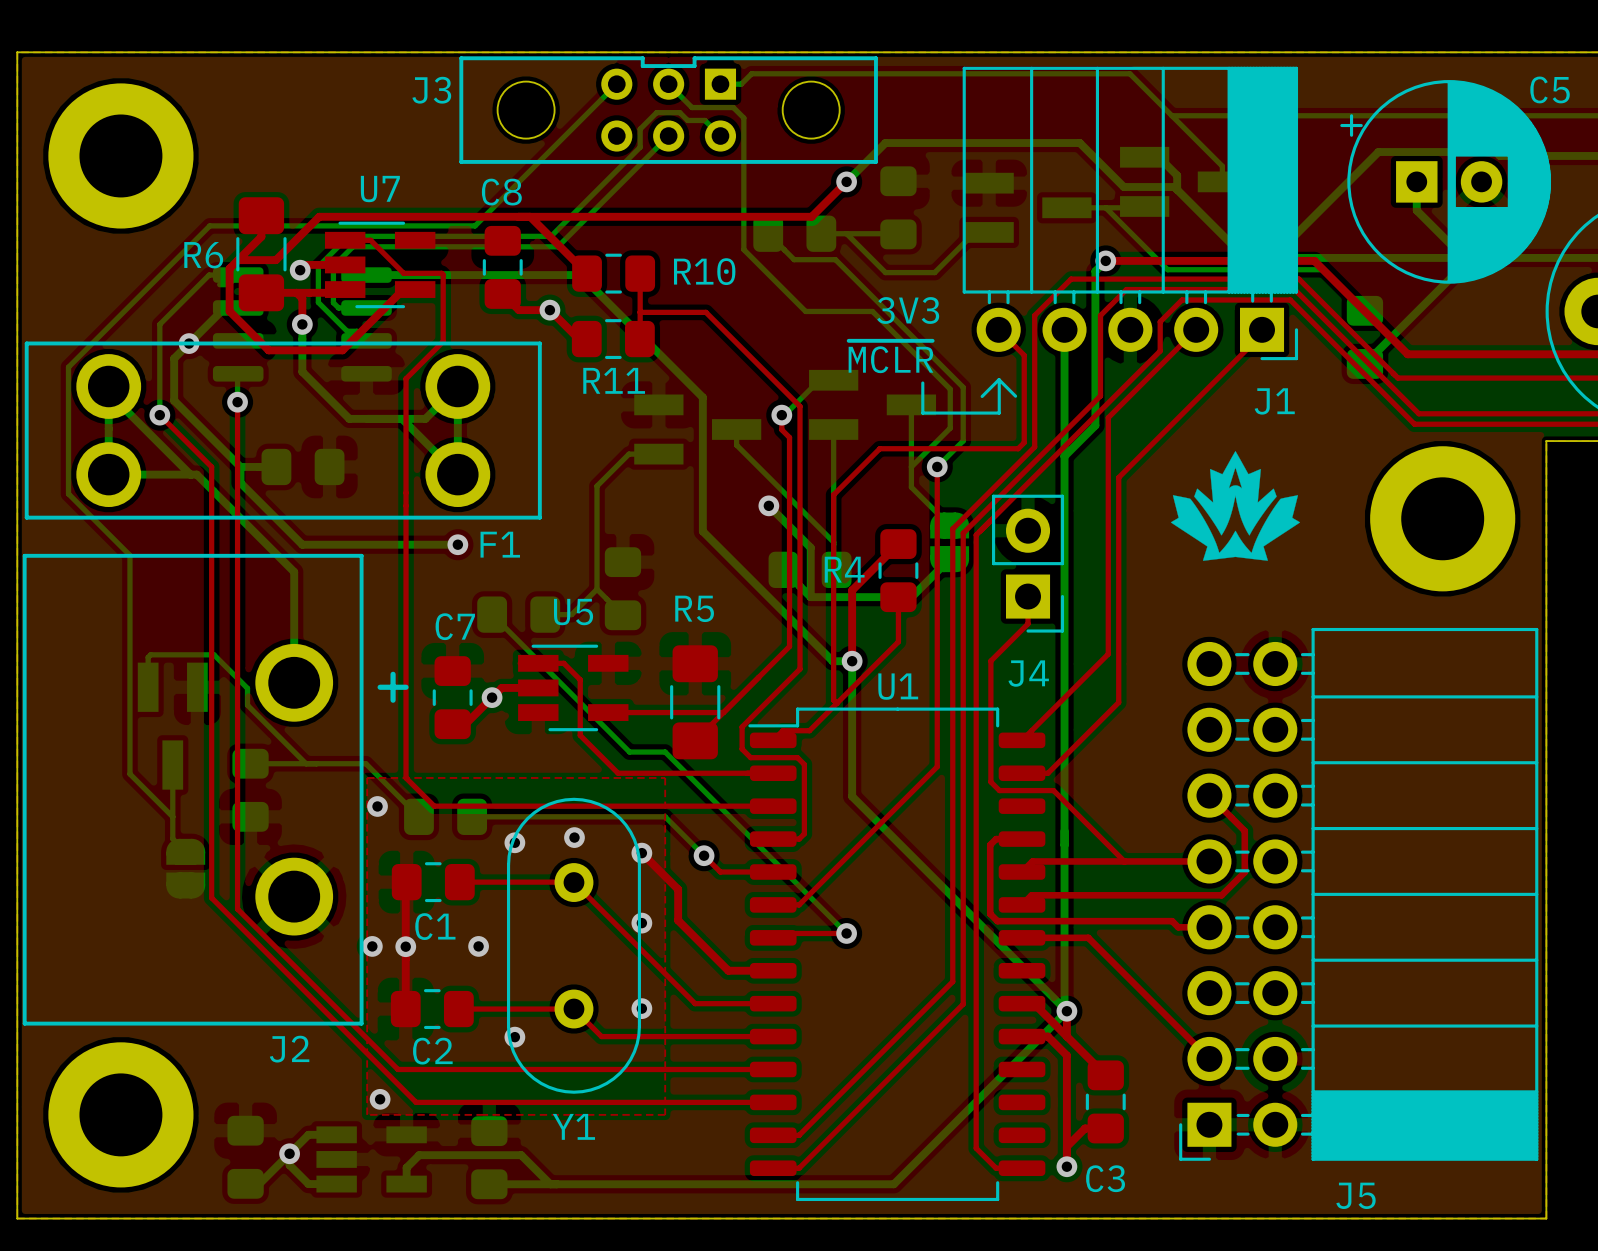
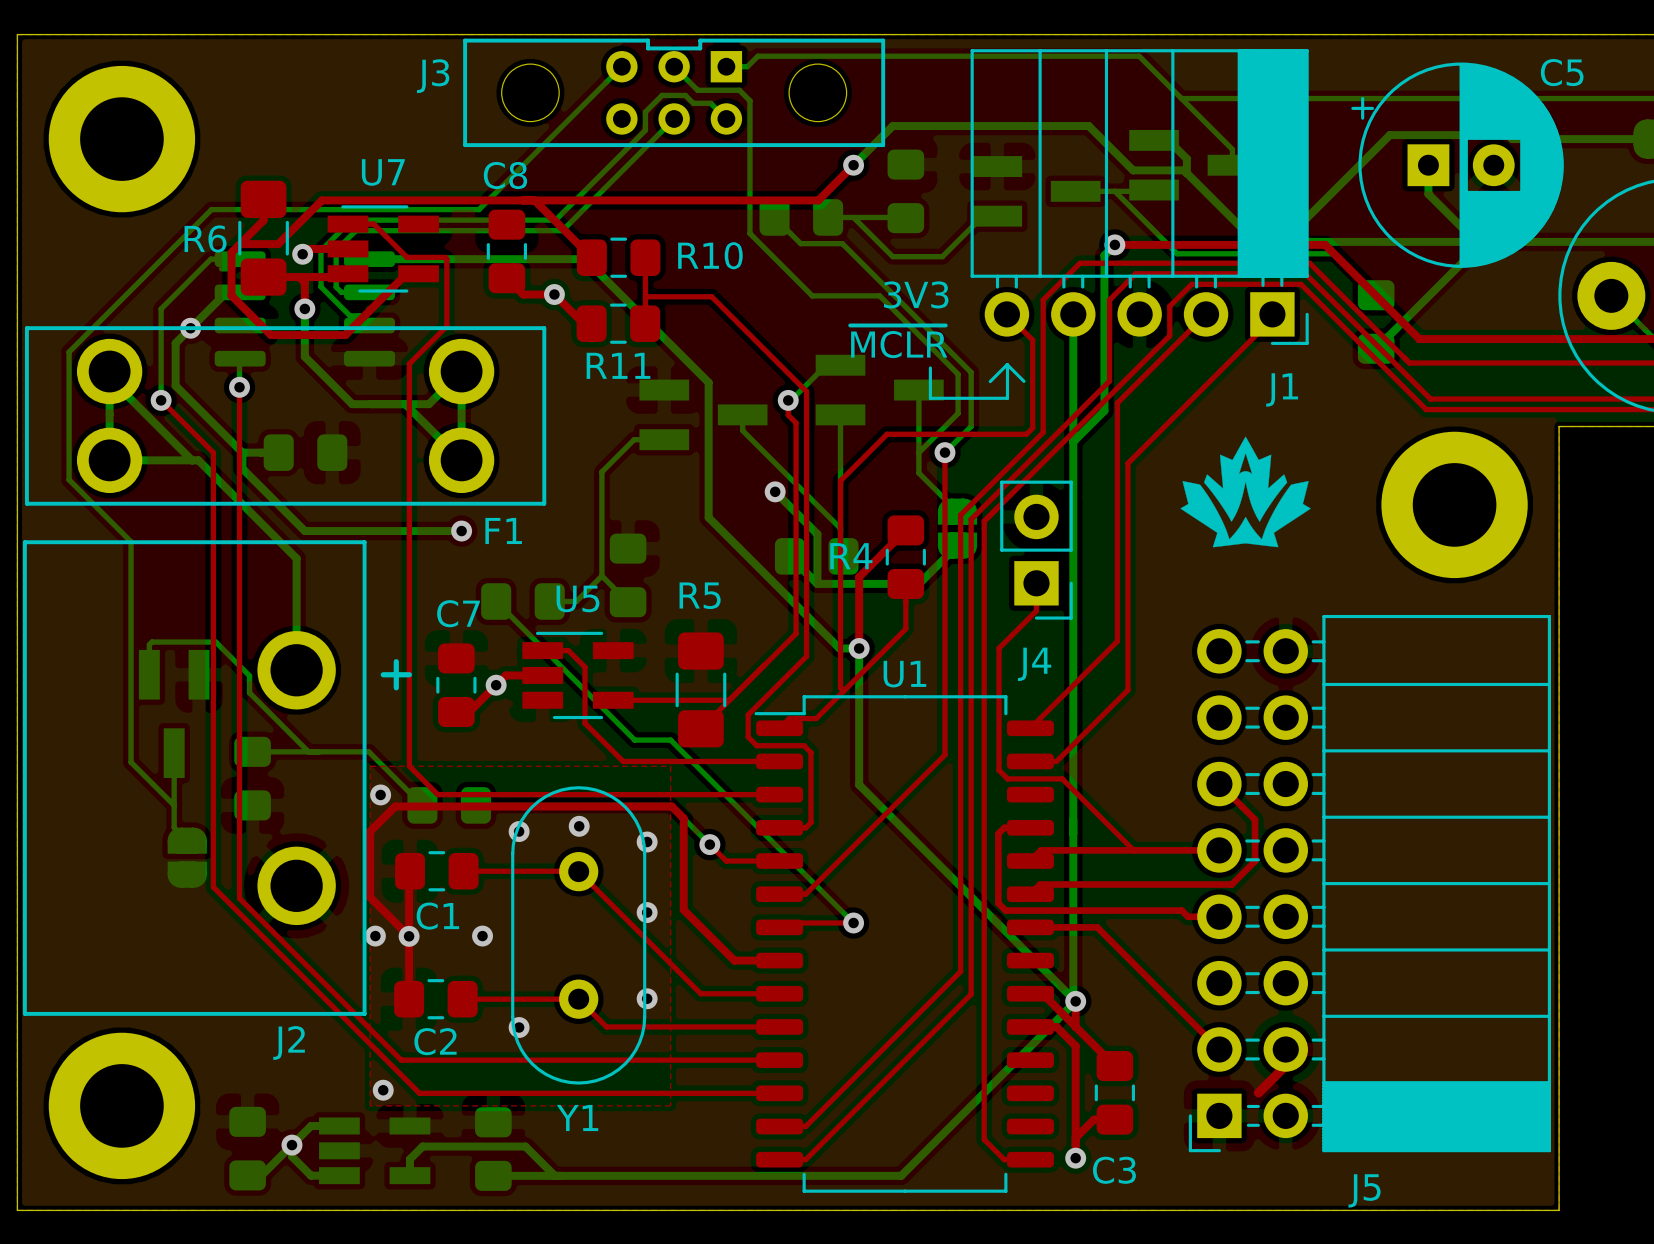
top track: (641, 853) (678, 889) -> (409, 936) (370, 897) (370, 831) (395, 806) (671, 806) (683, 818) (683, 878)
top track: none -> (1285, 1065) (1258, 1092)

